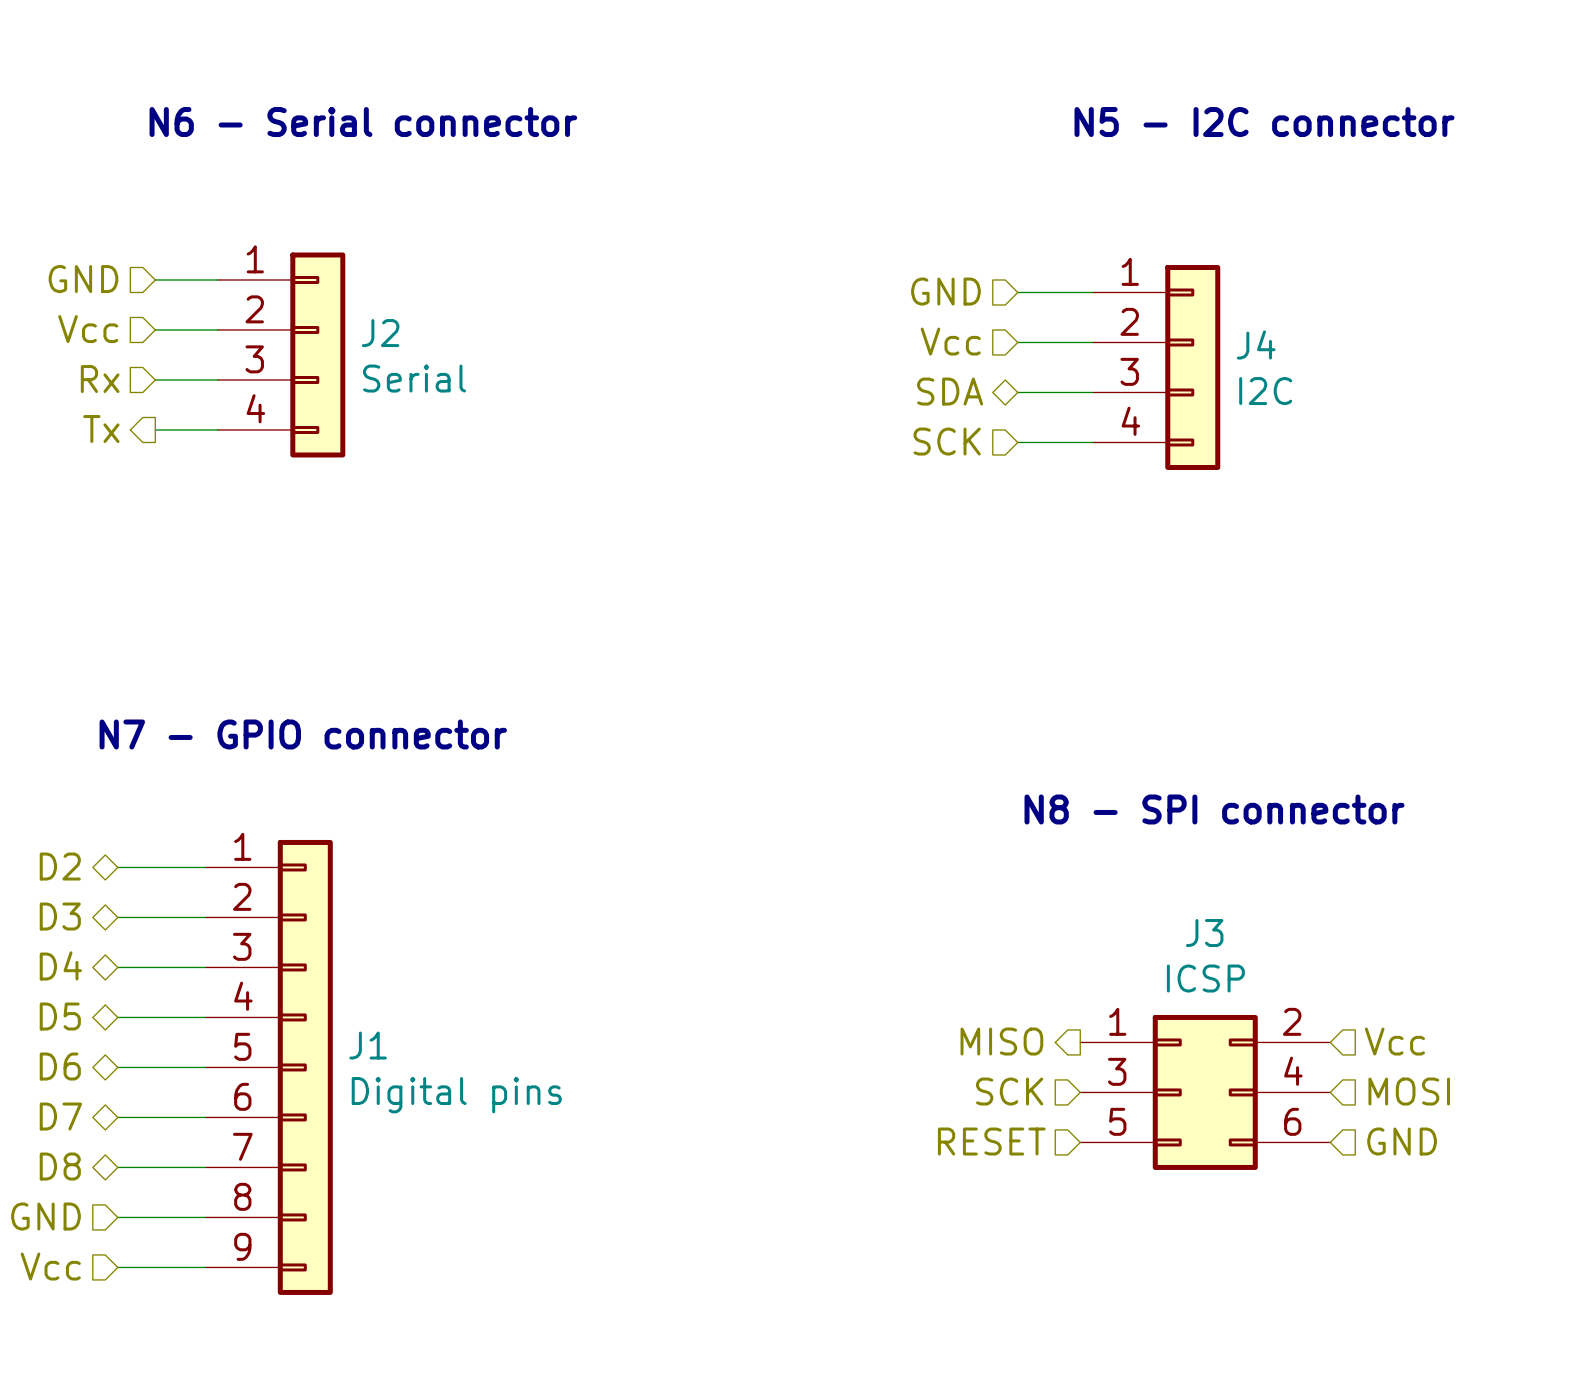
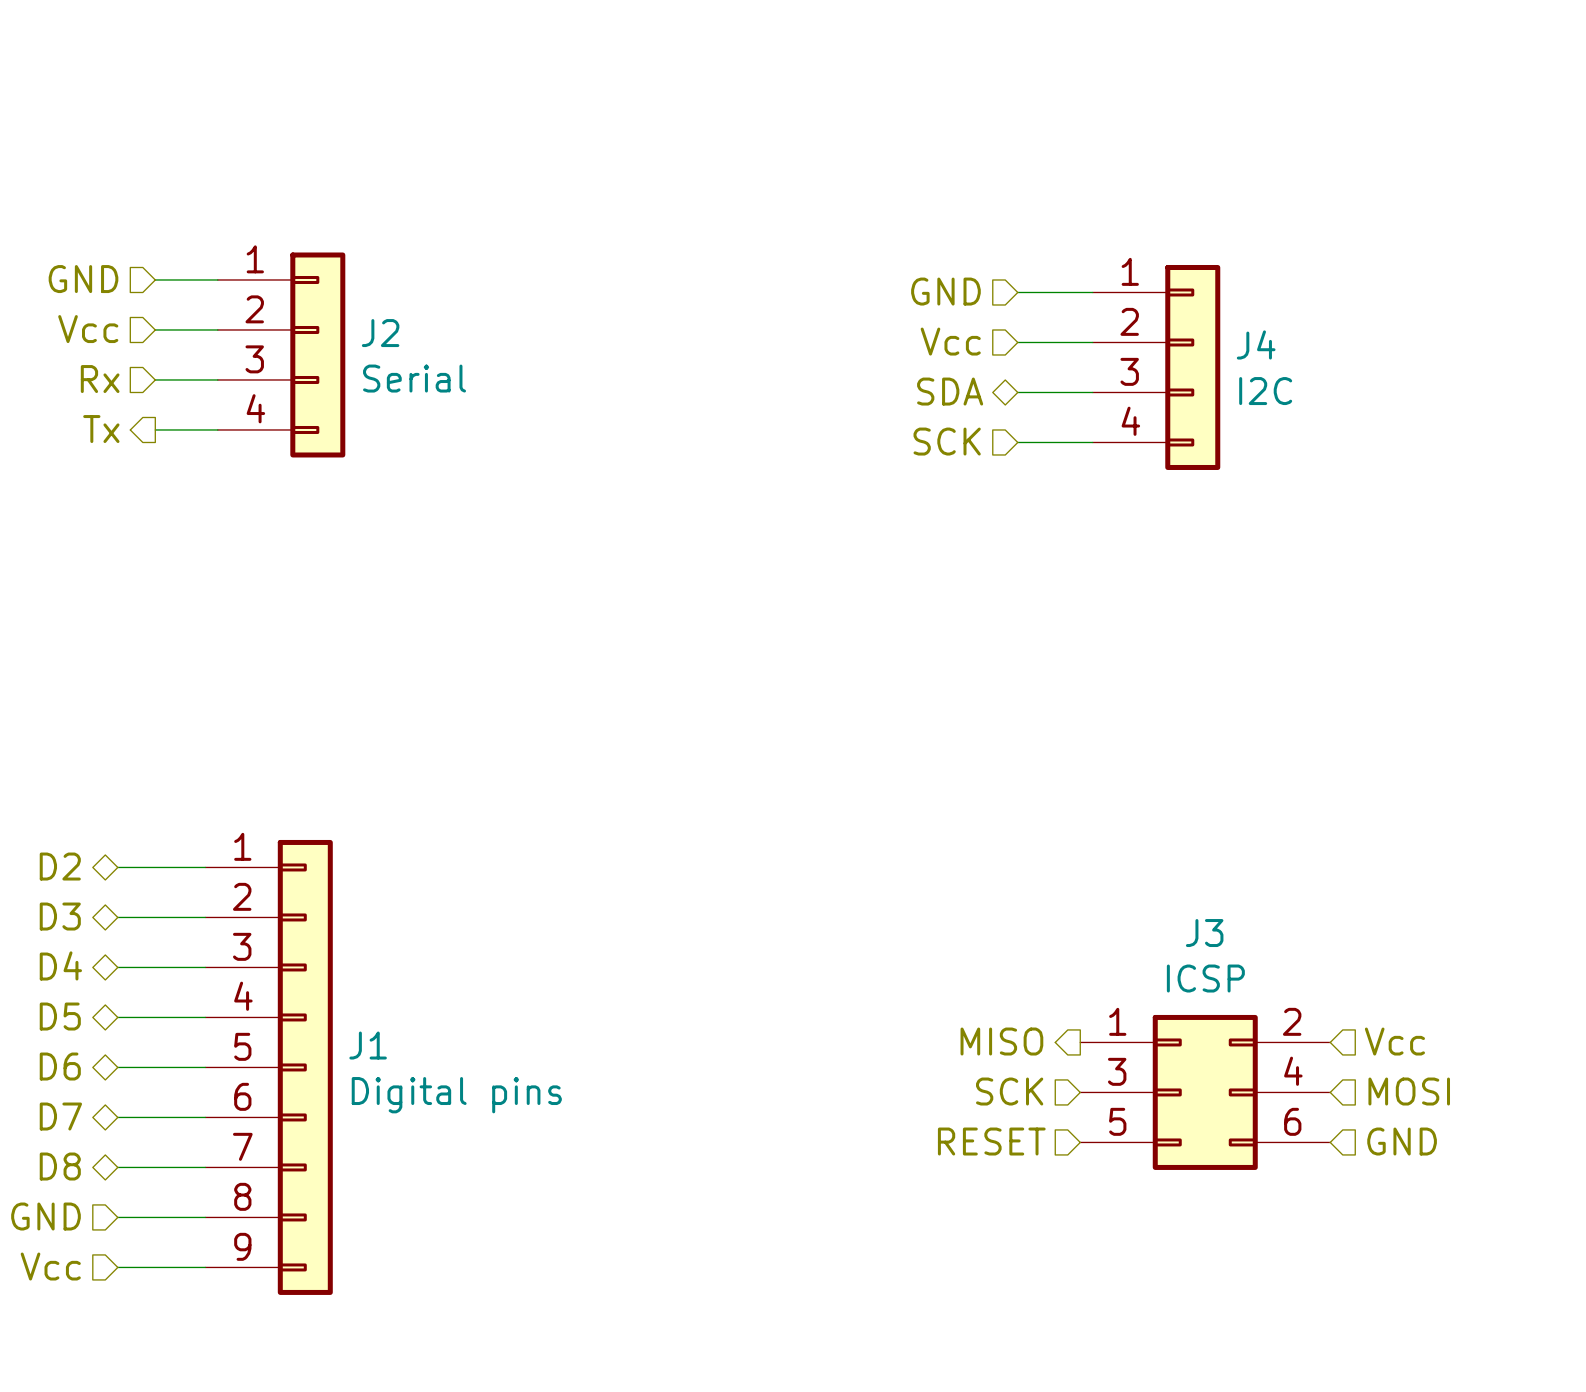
text: N6 - Serial connector (363, 122) -> none
text: N5 - I2C connector (1264, 122) -> none
text: N7 - GPIO connector (303, 734) -> none
text: N8 - SPI connector (1214, 809) -> none

